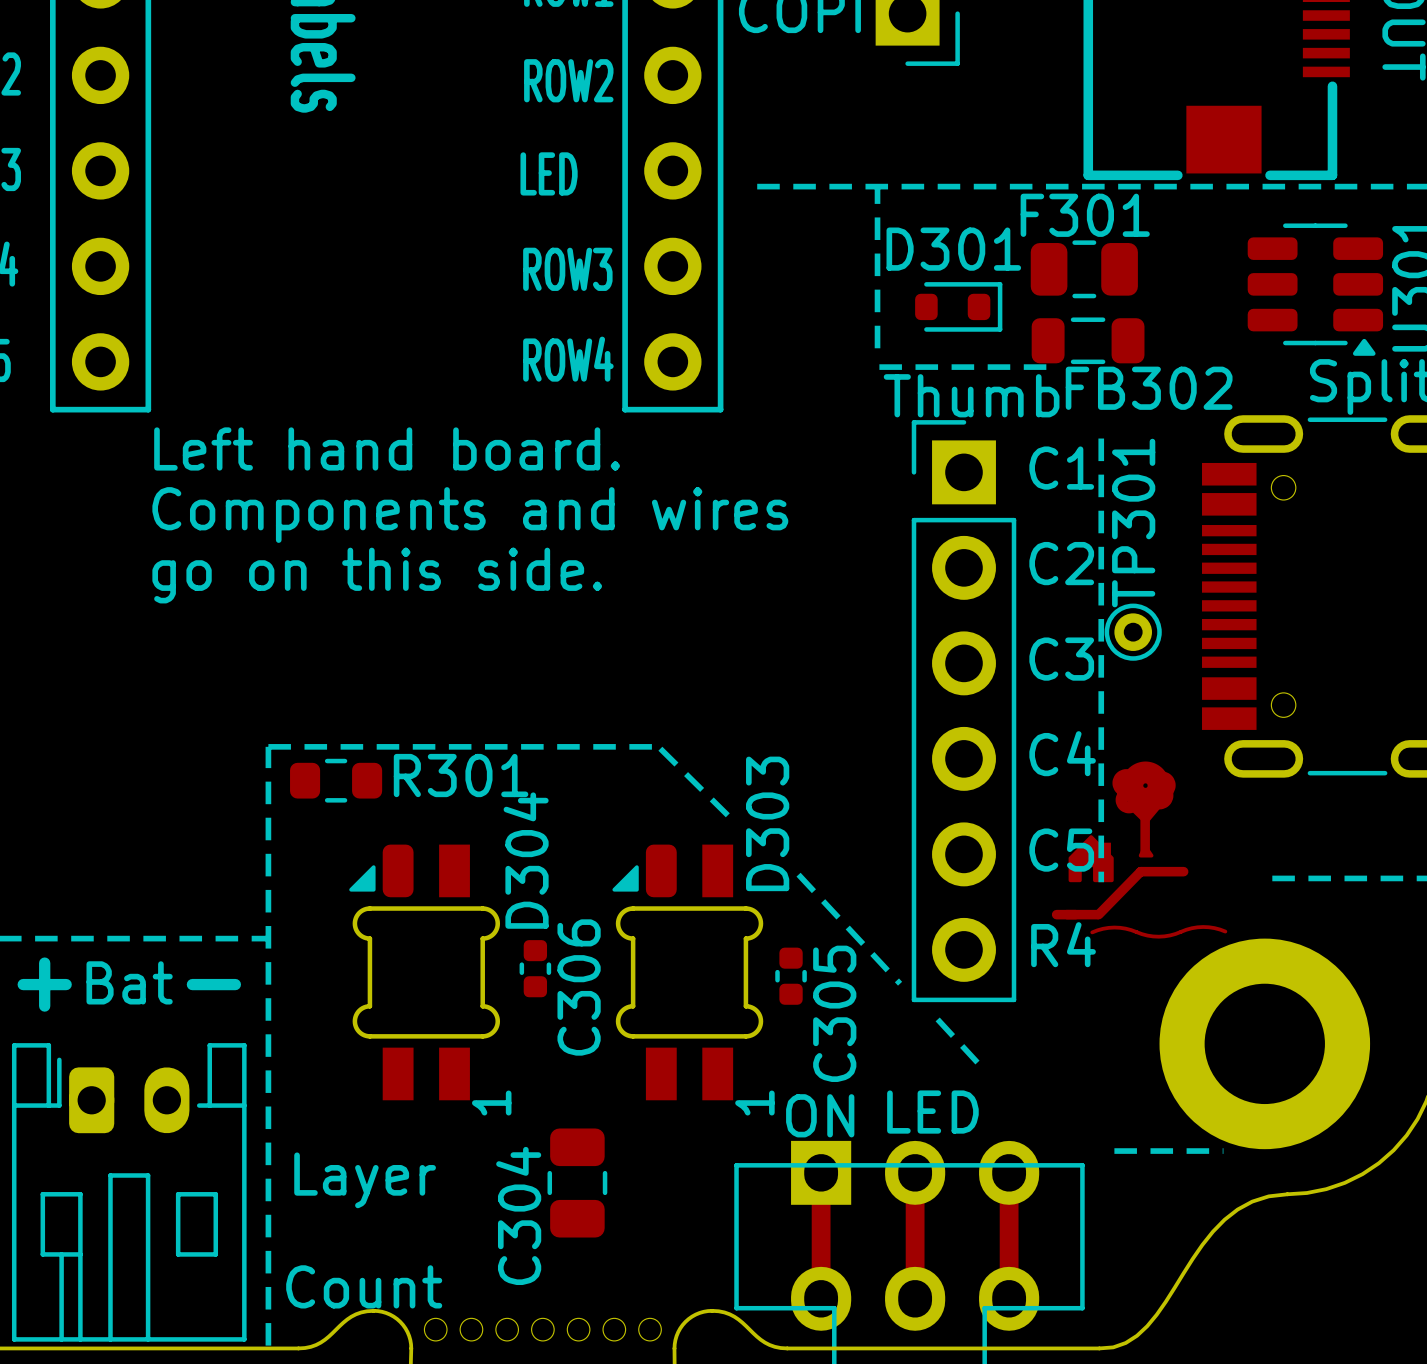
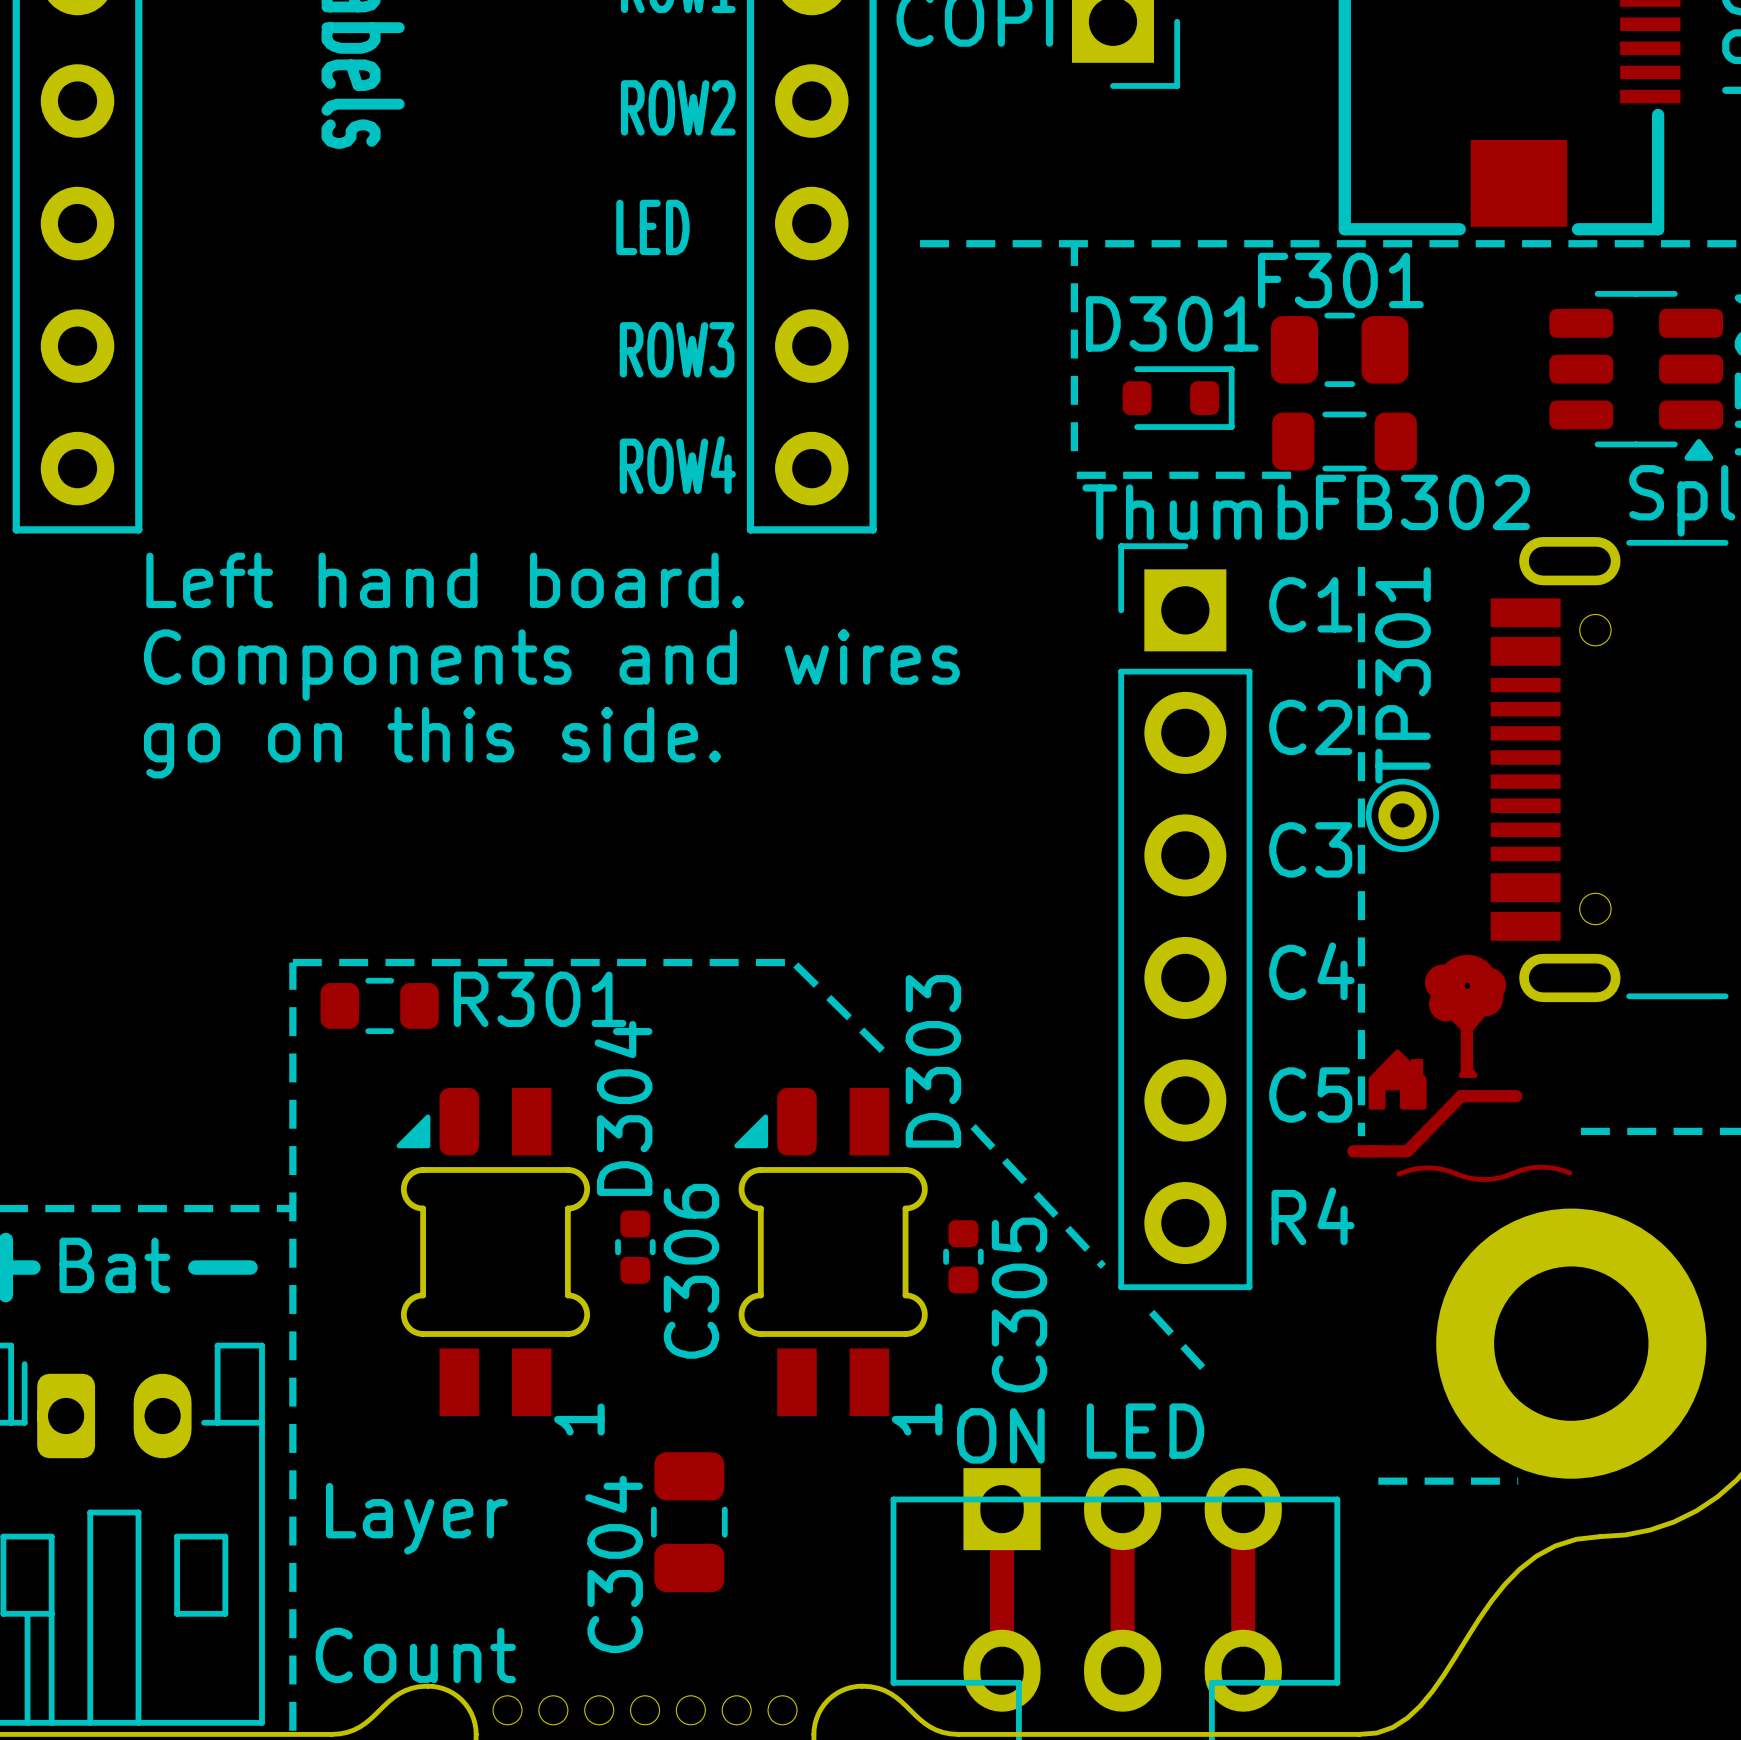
part position: (1144, 809) -> (1465, 1016)
part position: (1091, 858) -> (1397, 1079)
part position: (1120, 893) -> (1434, 1123)
part position: (1158, 931) -> (1484, 1173)

